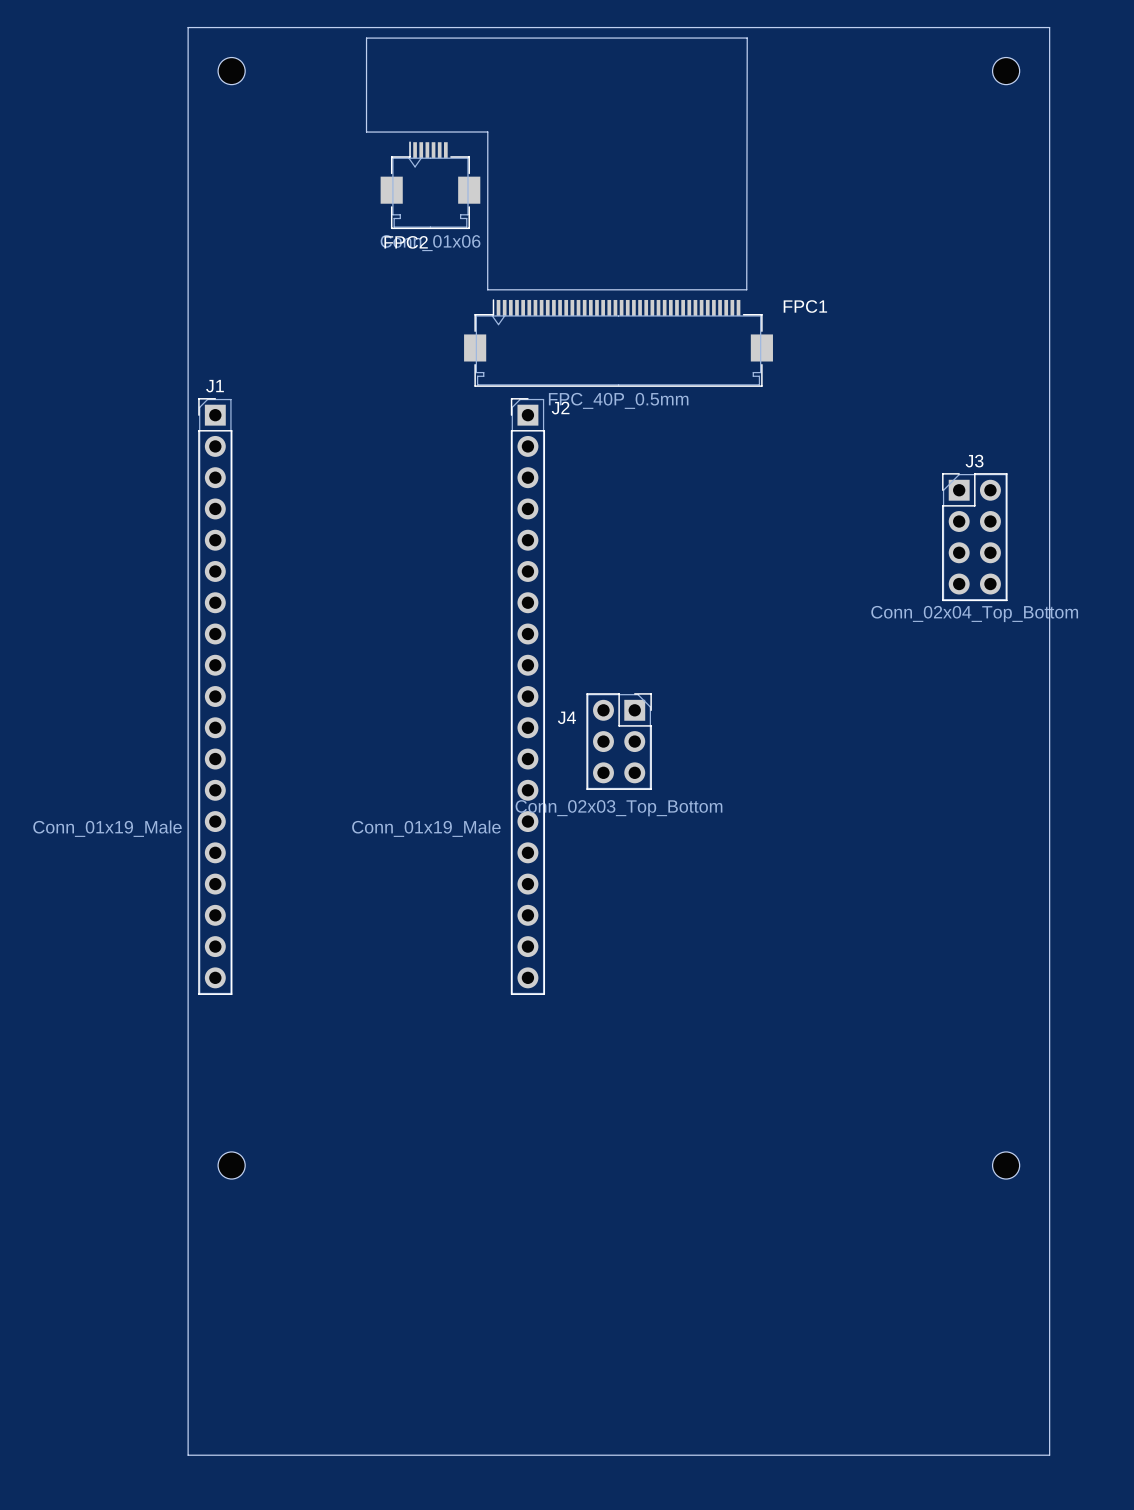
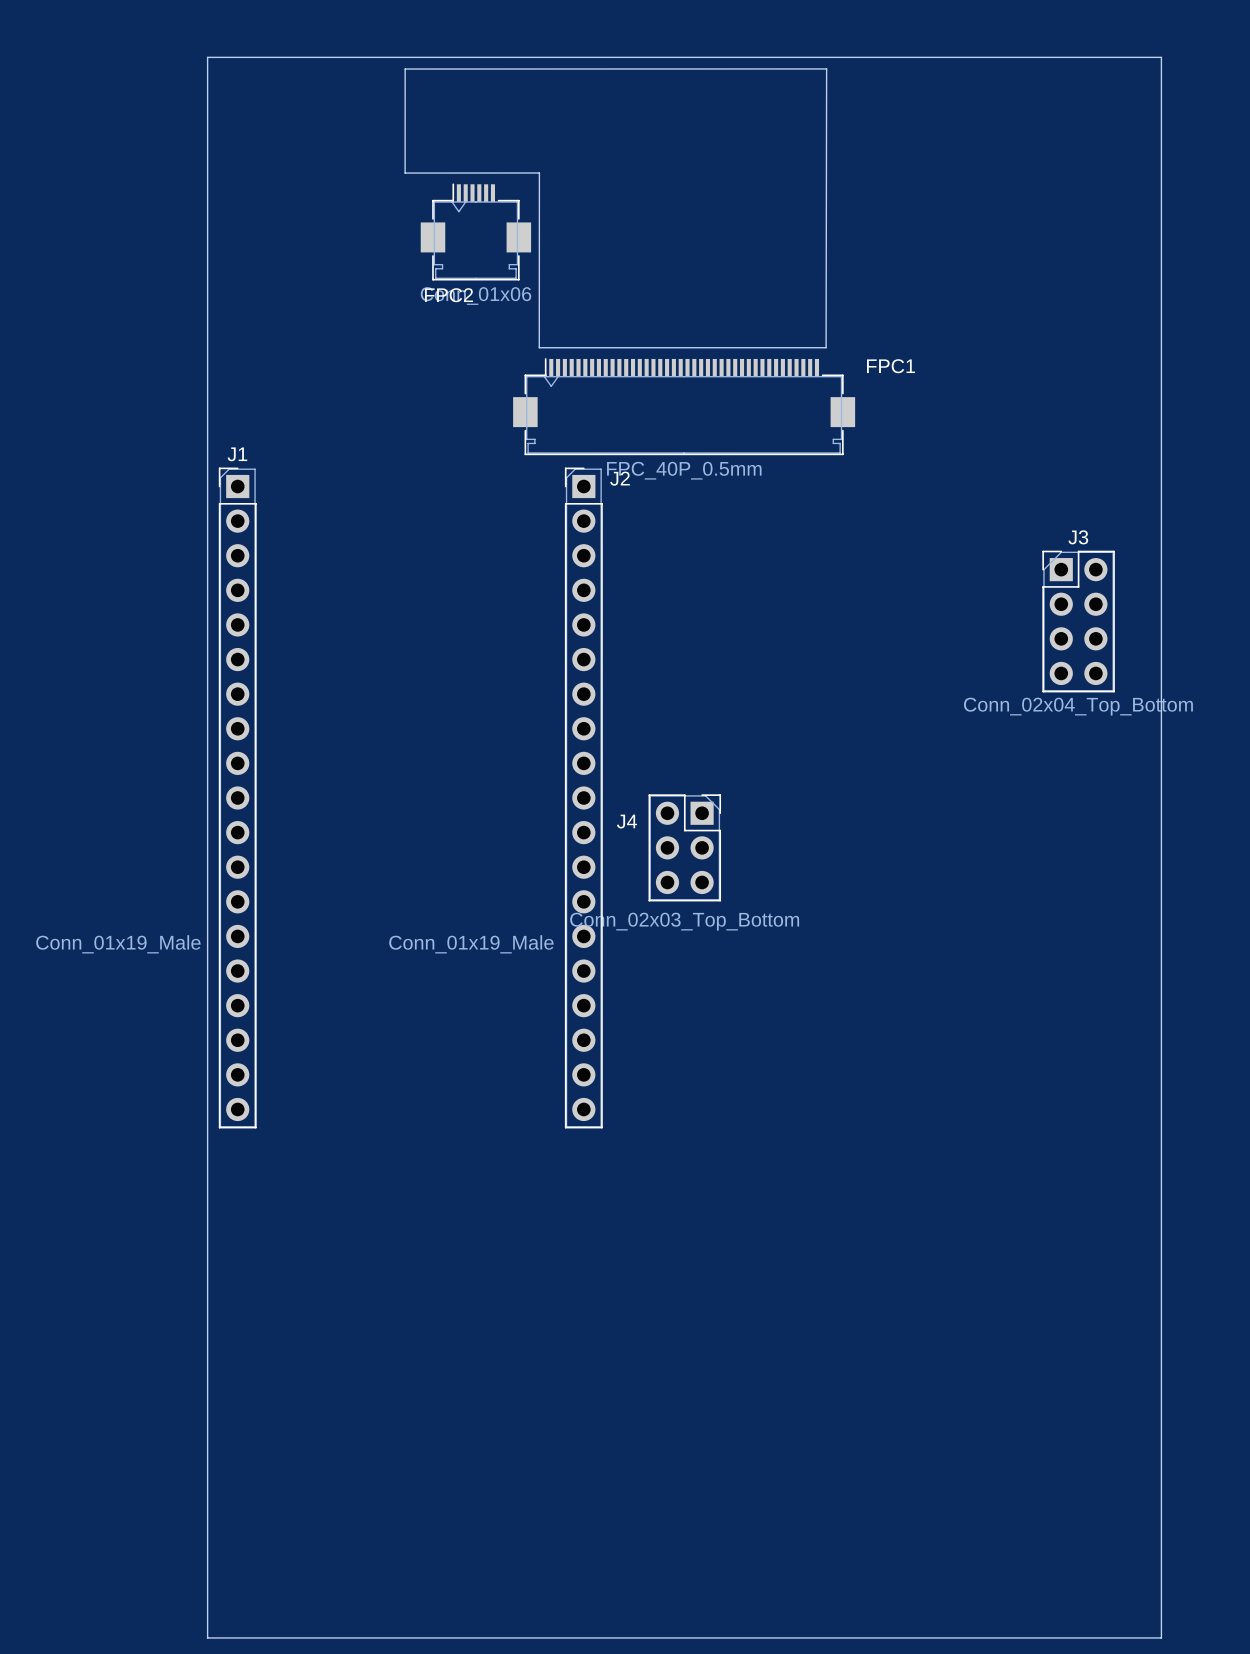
part: (231, 71) -> none
part: (1006, 71) -> none
part: (231, 1165) -> none
part: (1006, 1165) -> none

